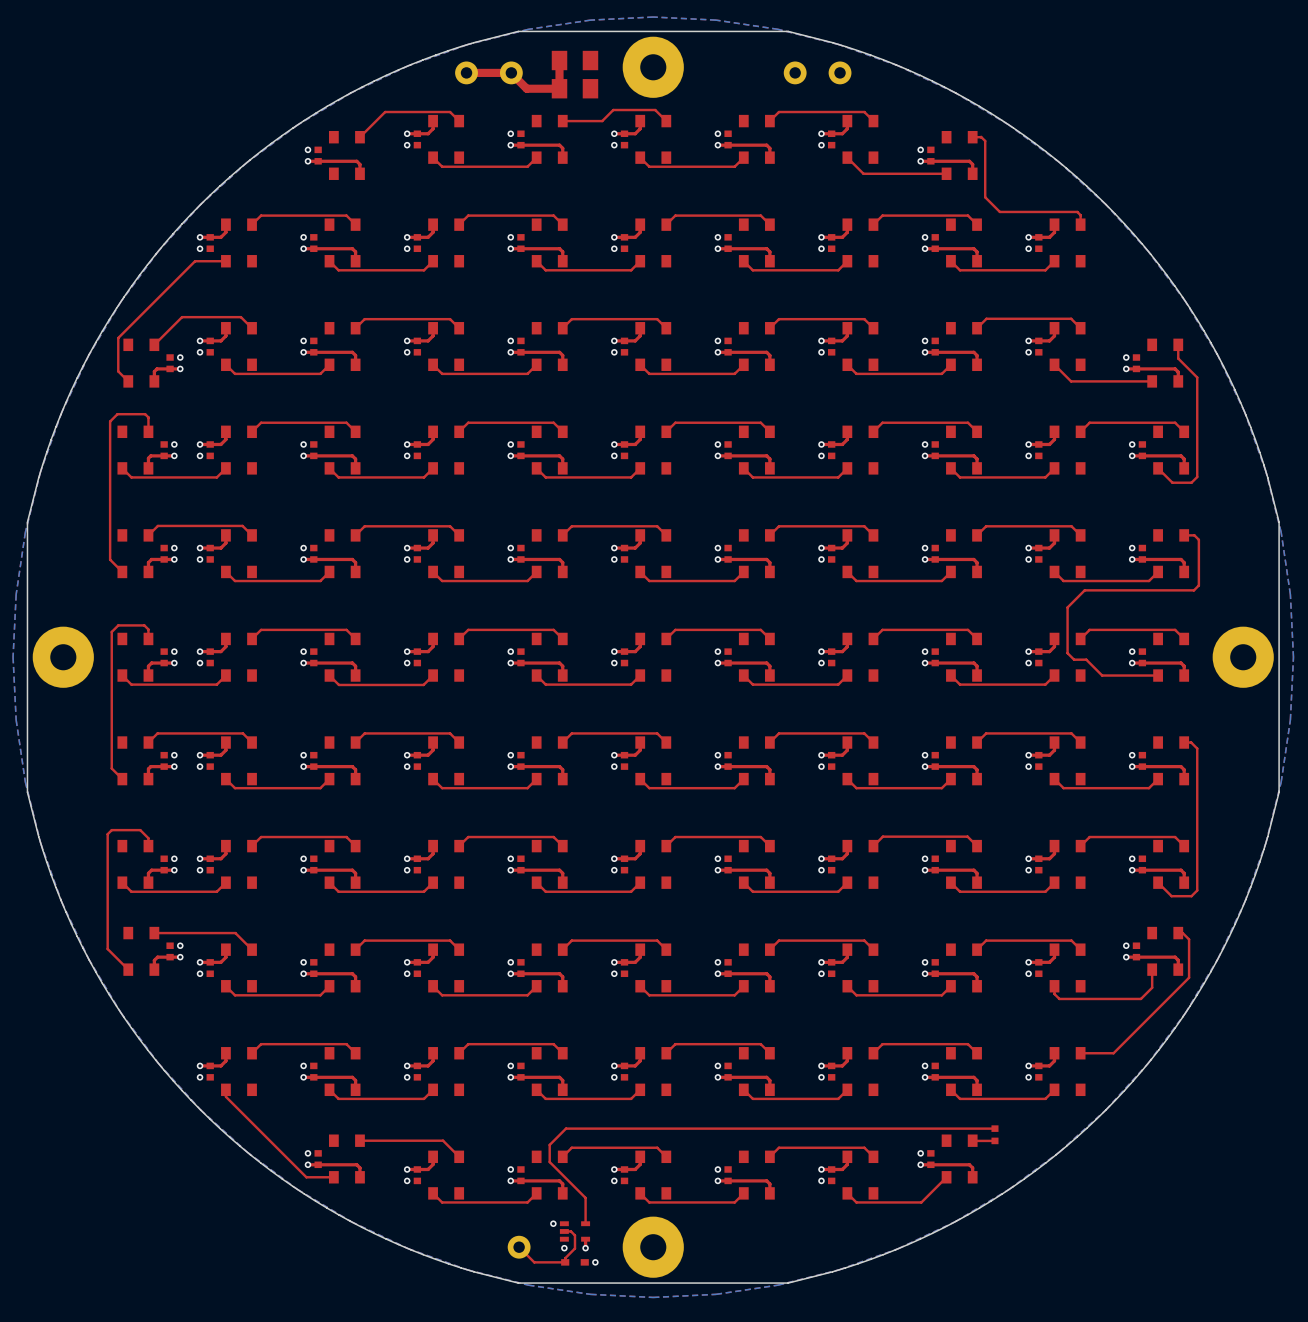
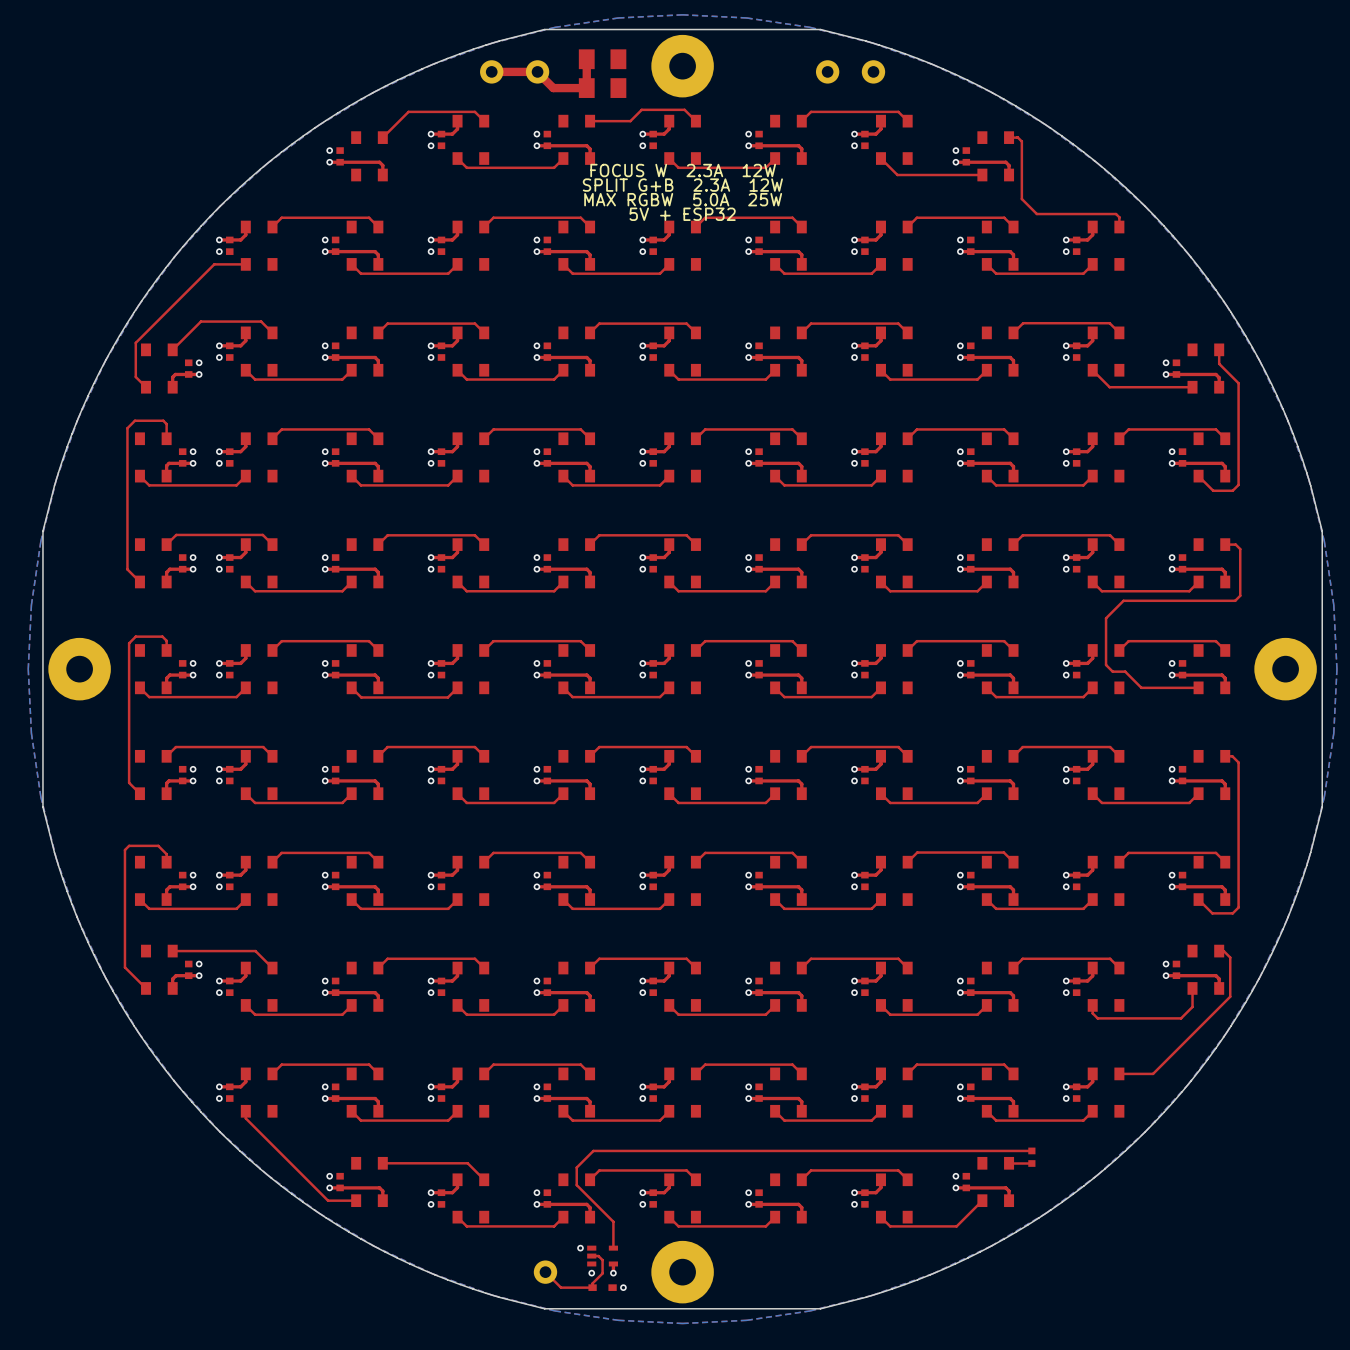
text: none -> FOCUS W 2.3A 12W (683, 170)
text: none -> SPLIT G+B 2.3A 12W (682, 185)
text: none -> MAX RGBW 5.0A 25W (683, 199)
text: none -> 5V + ESP32 (682, 214)

